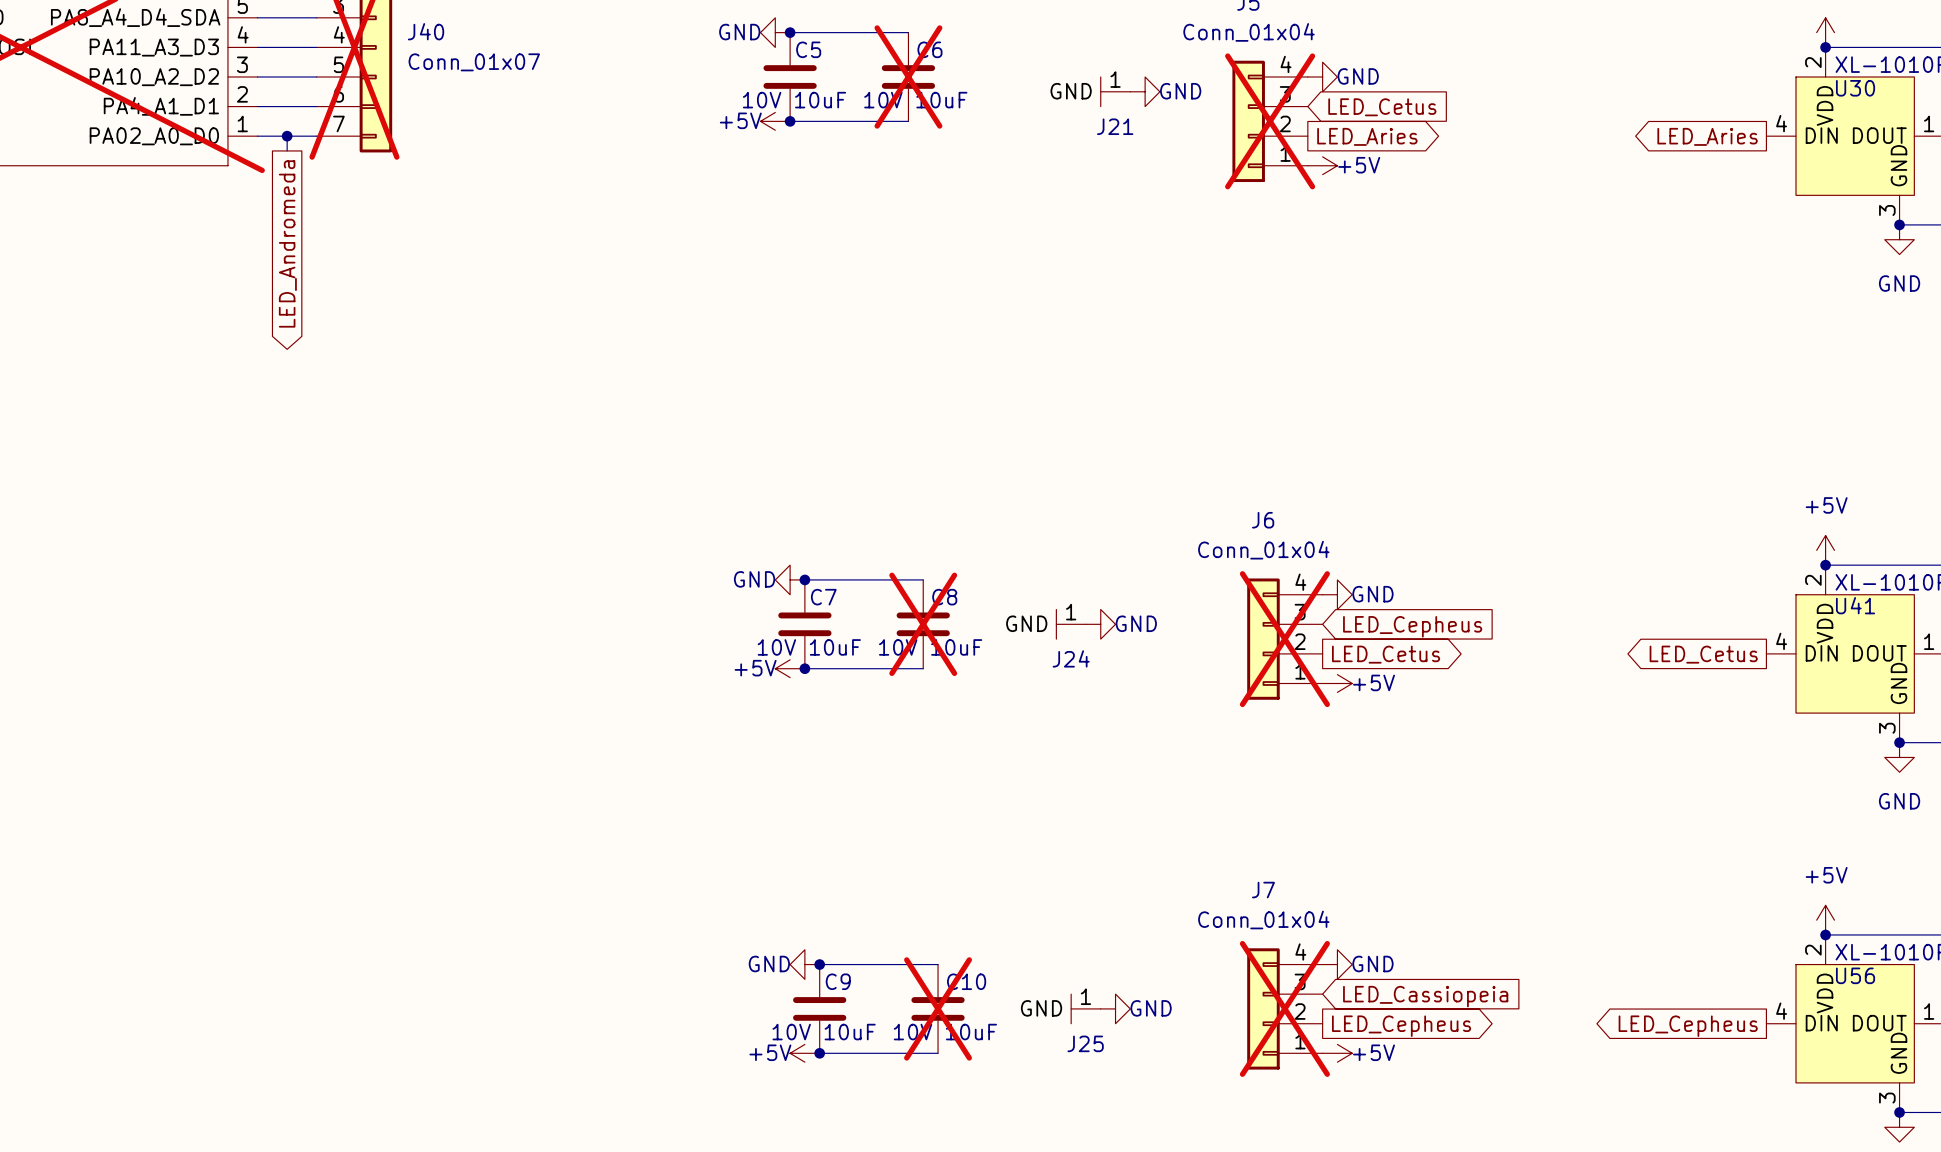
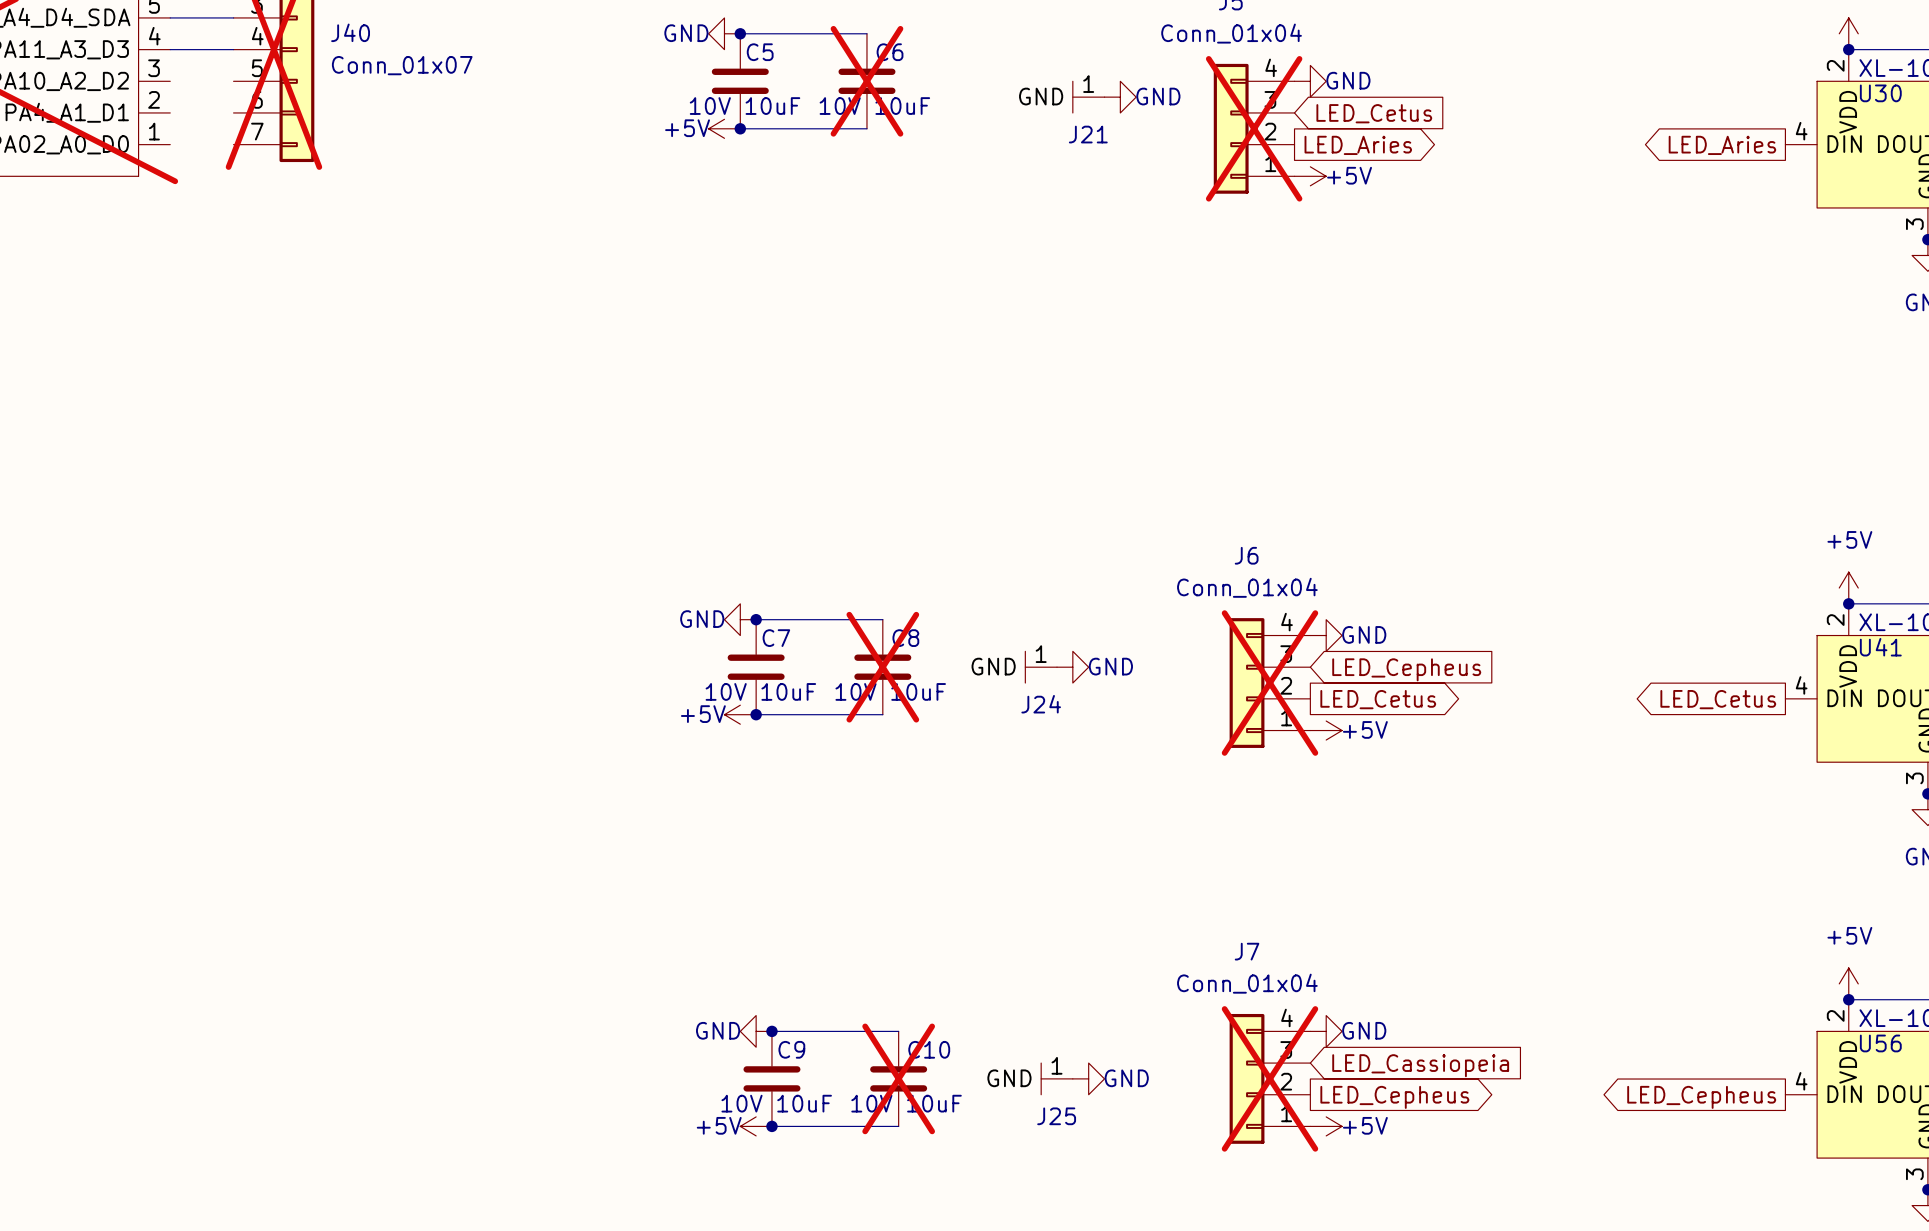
wire: (257, 77) (316, 77) -> none
wire: (257, 106) (316, 106) -> none
wire: (257, 136) (316, 136) -> none
wire: (287, 136) (287, 150) -> none
junction: (287, 136) -> none
global label: LED_Andromeda (287, 243) -> none

